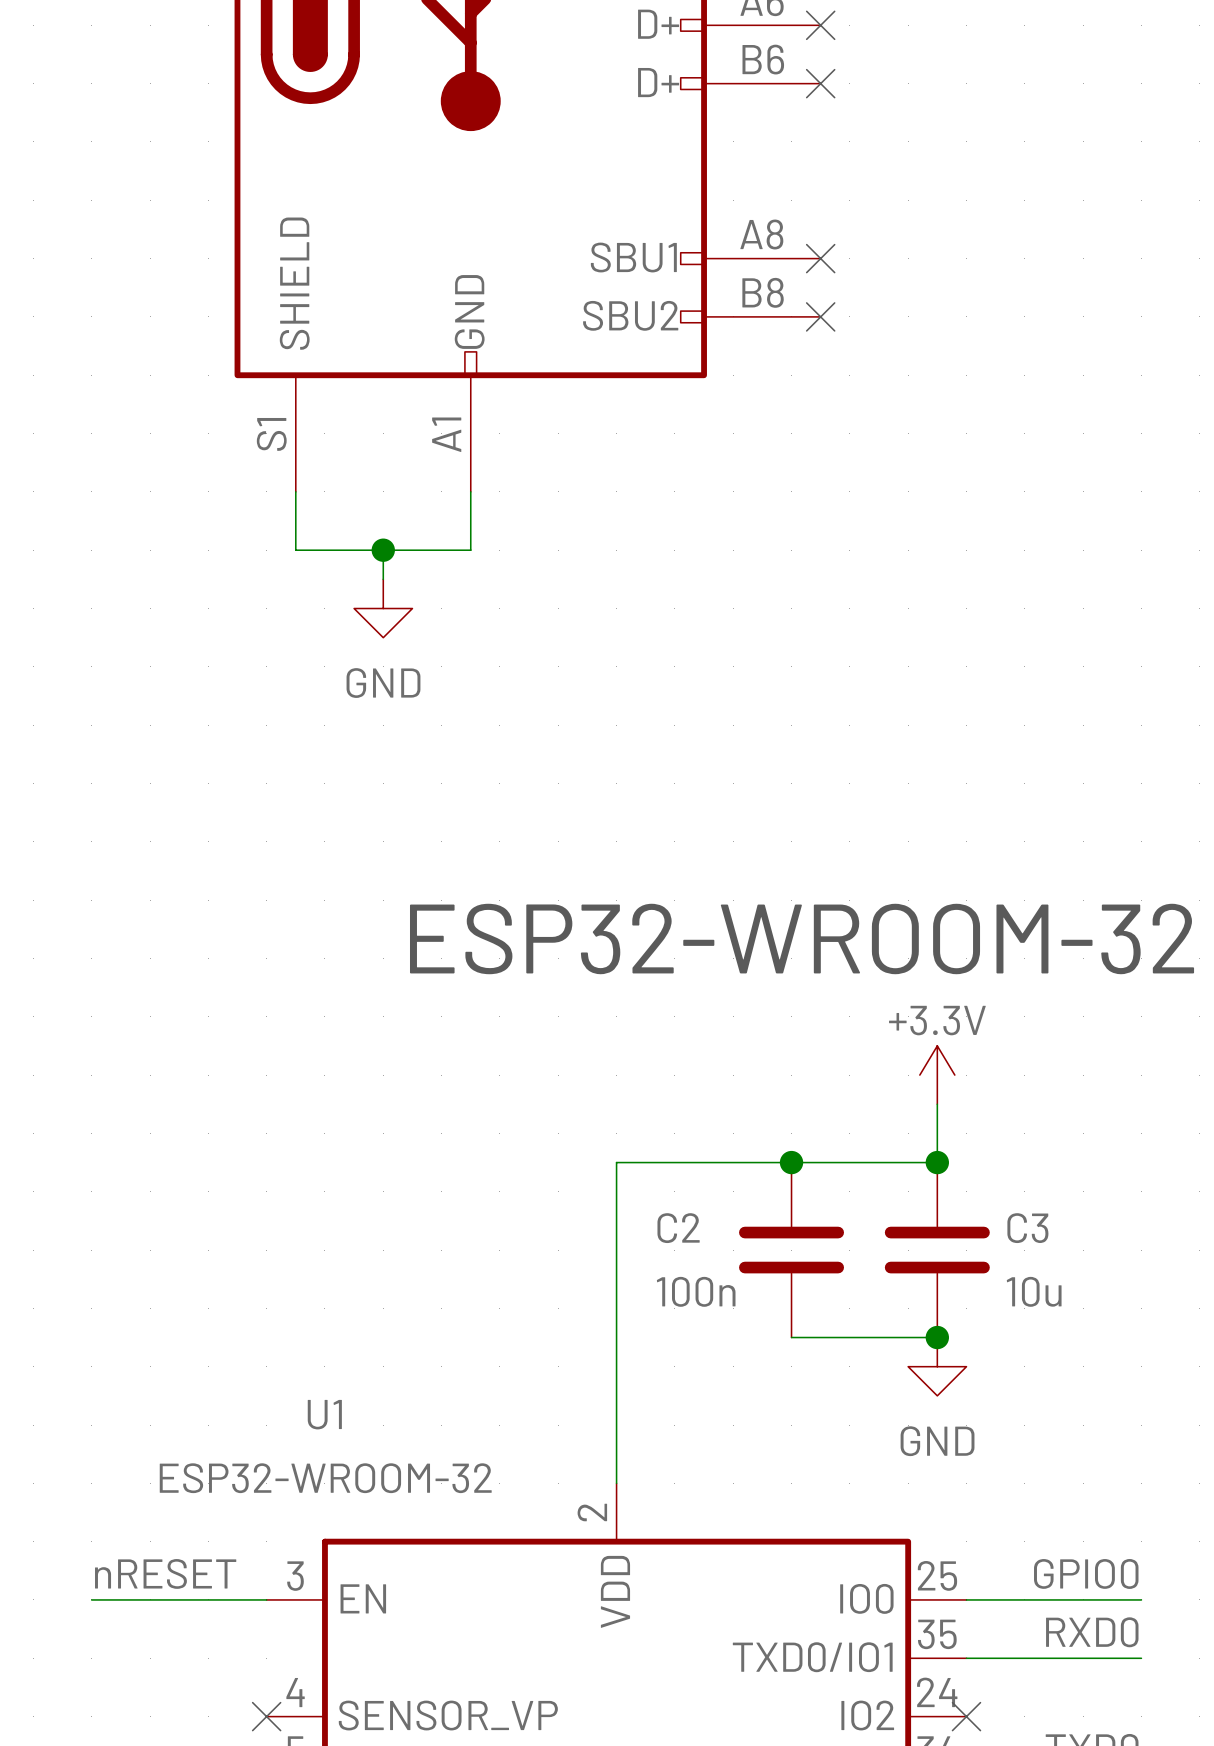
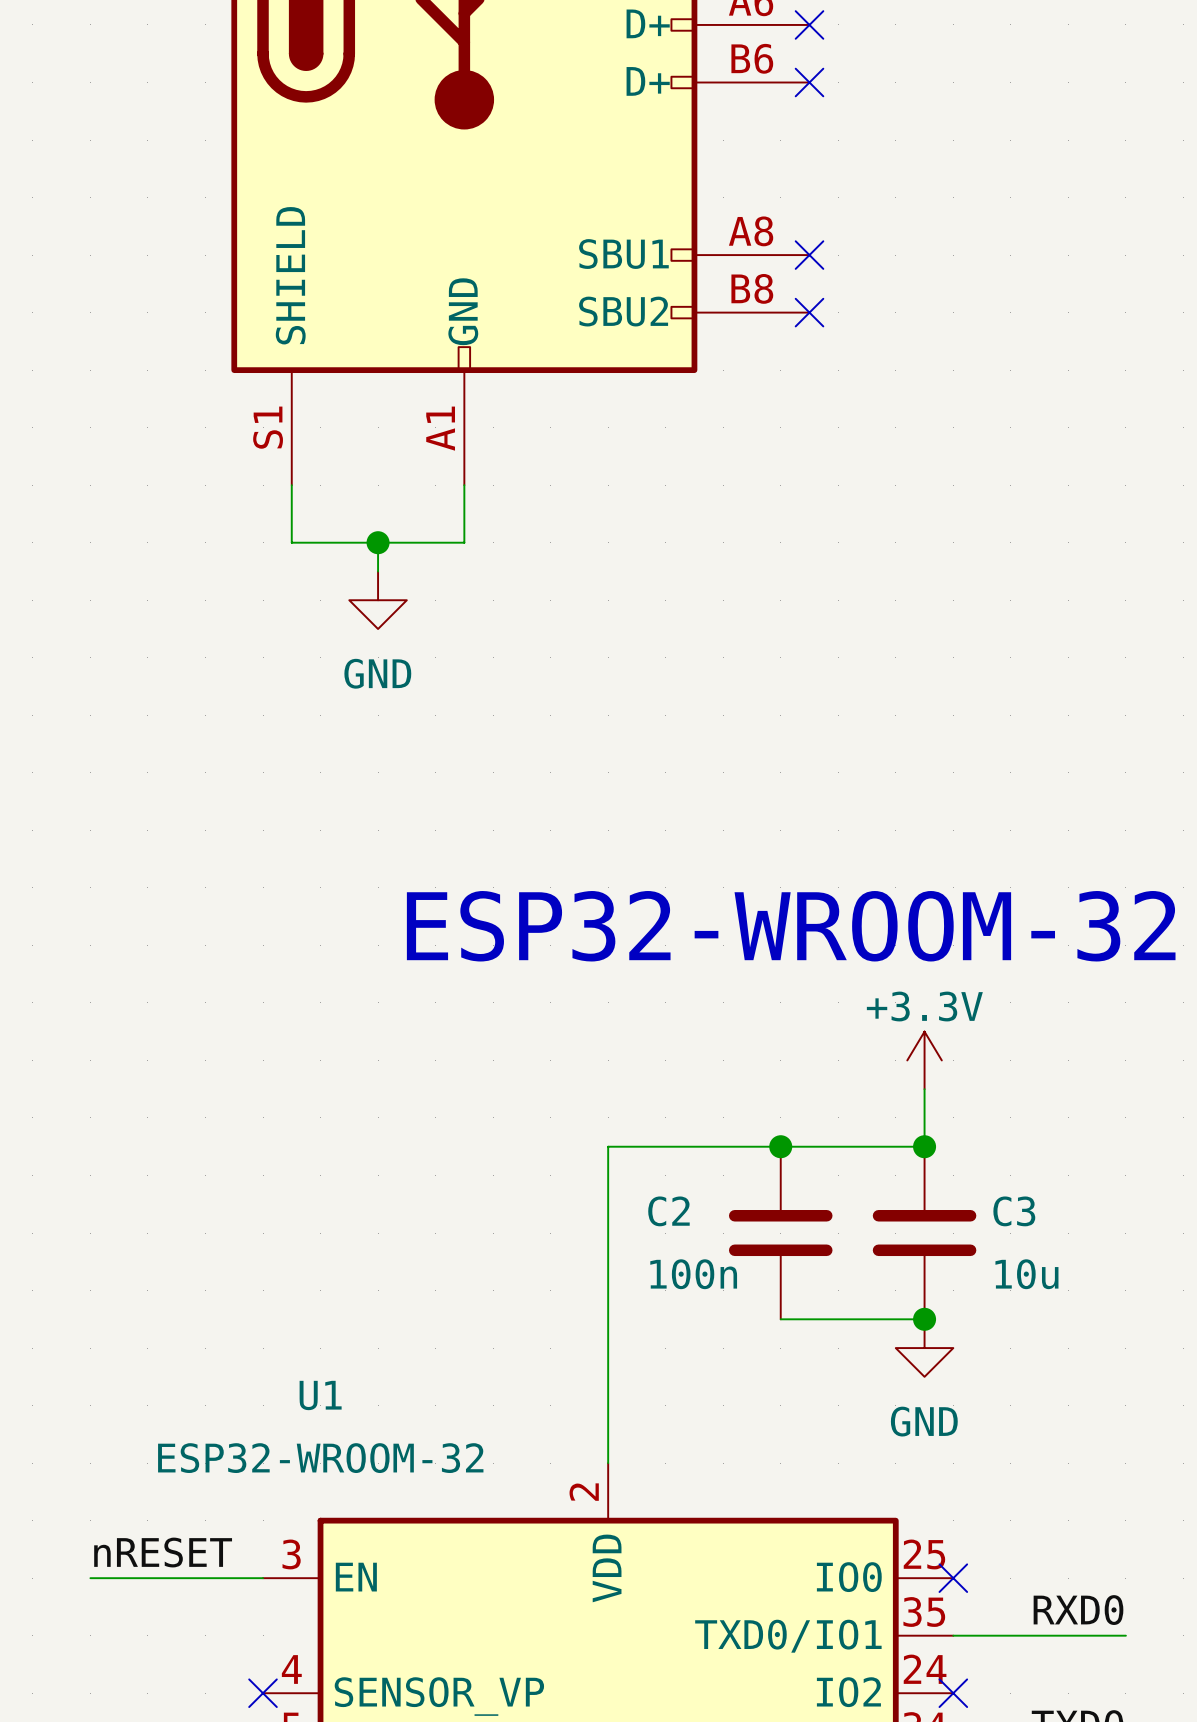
label: GPIO0 (1086, 1573) -> none
wire: (966, 1599) (1141, 1599) -> none
no-connect mark: none -> (953, 1578)

